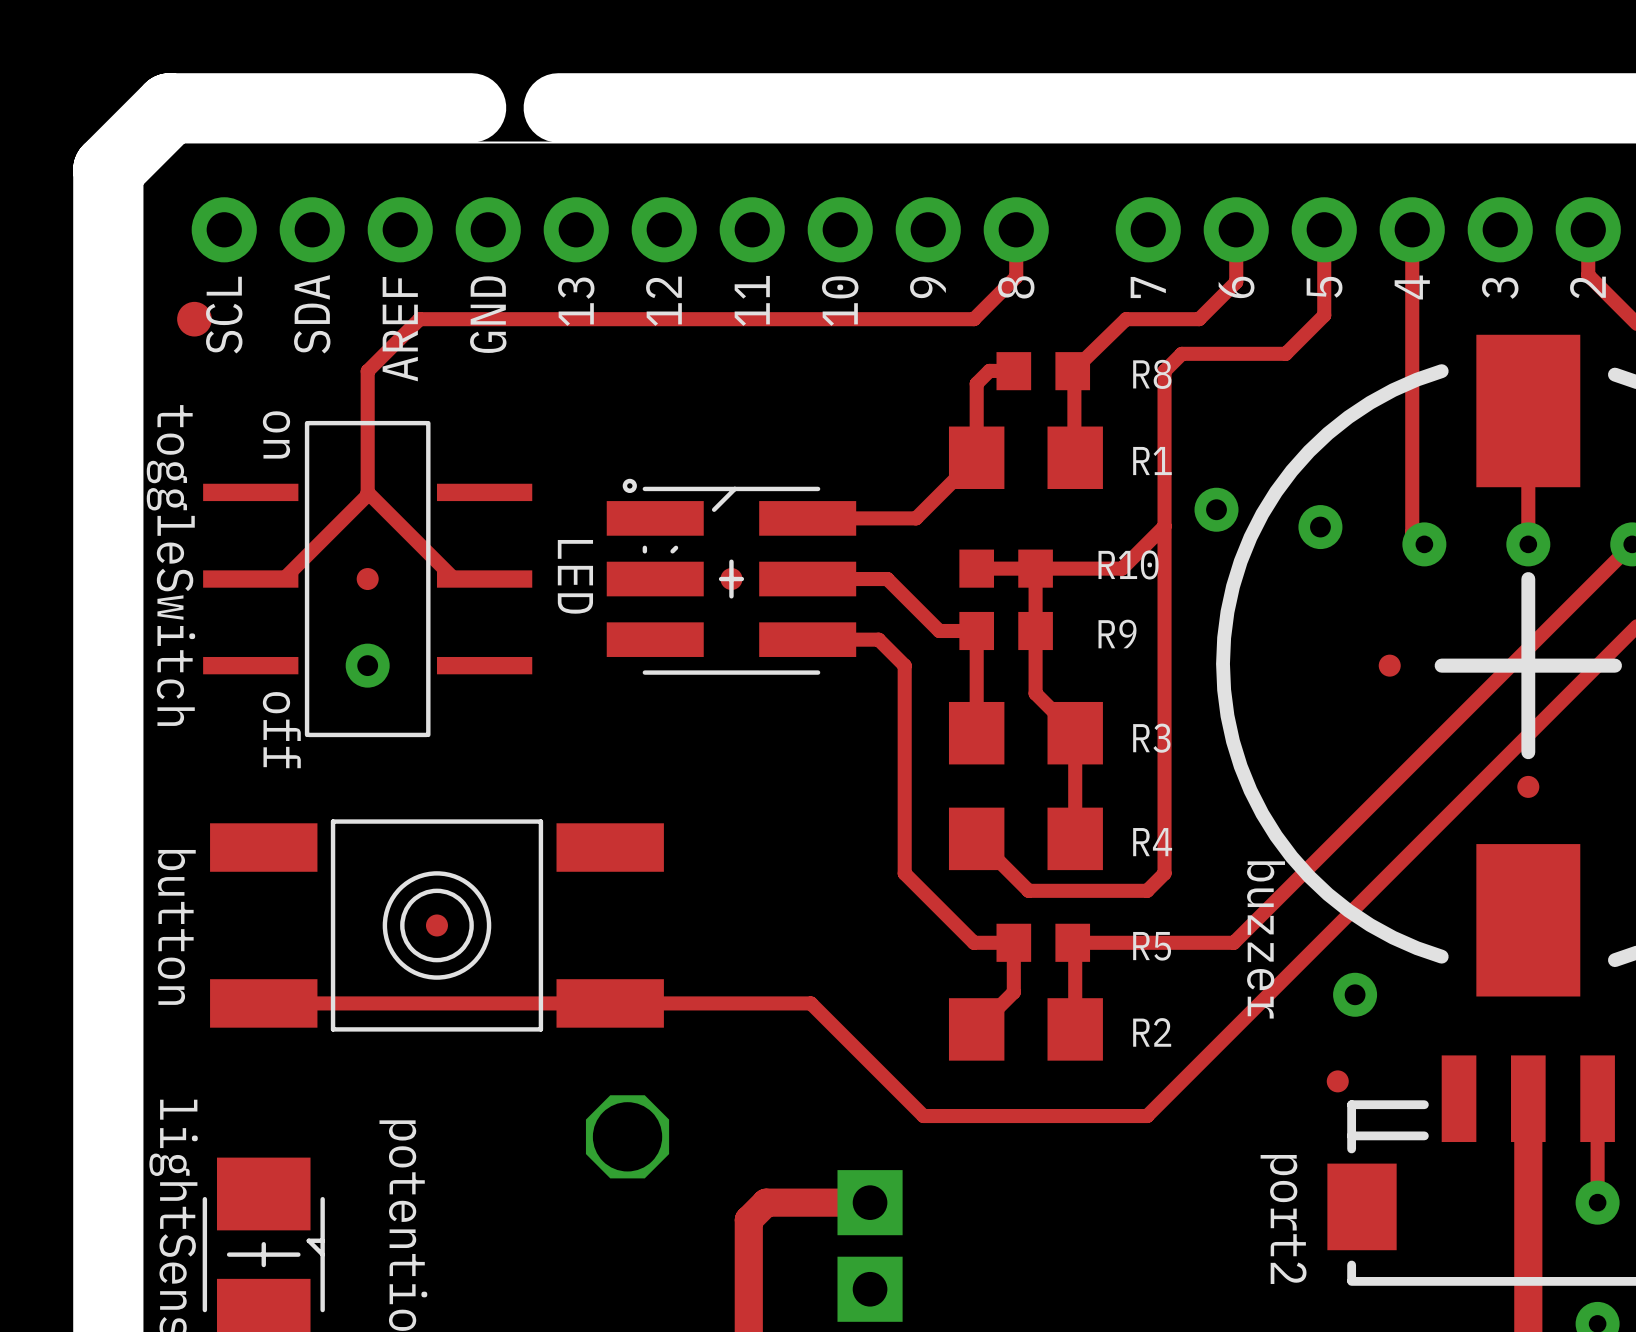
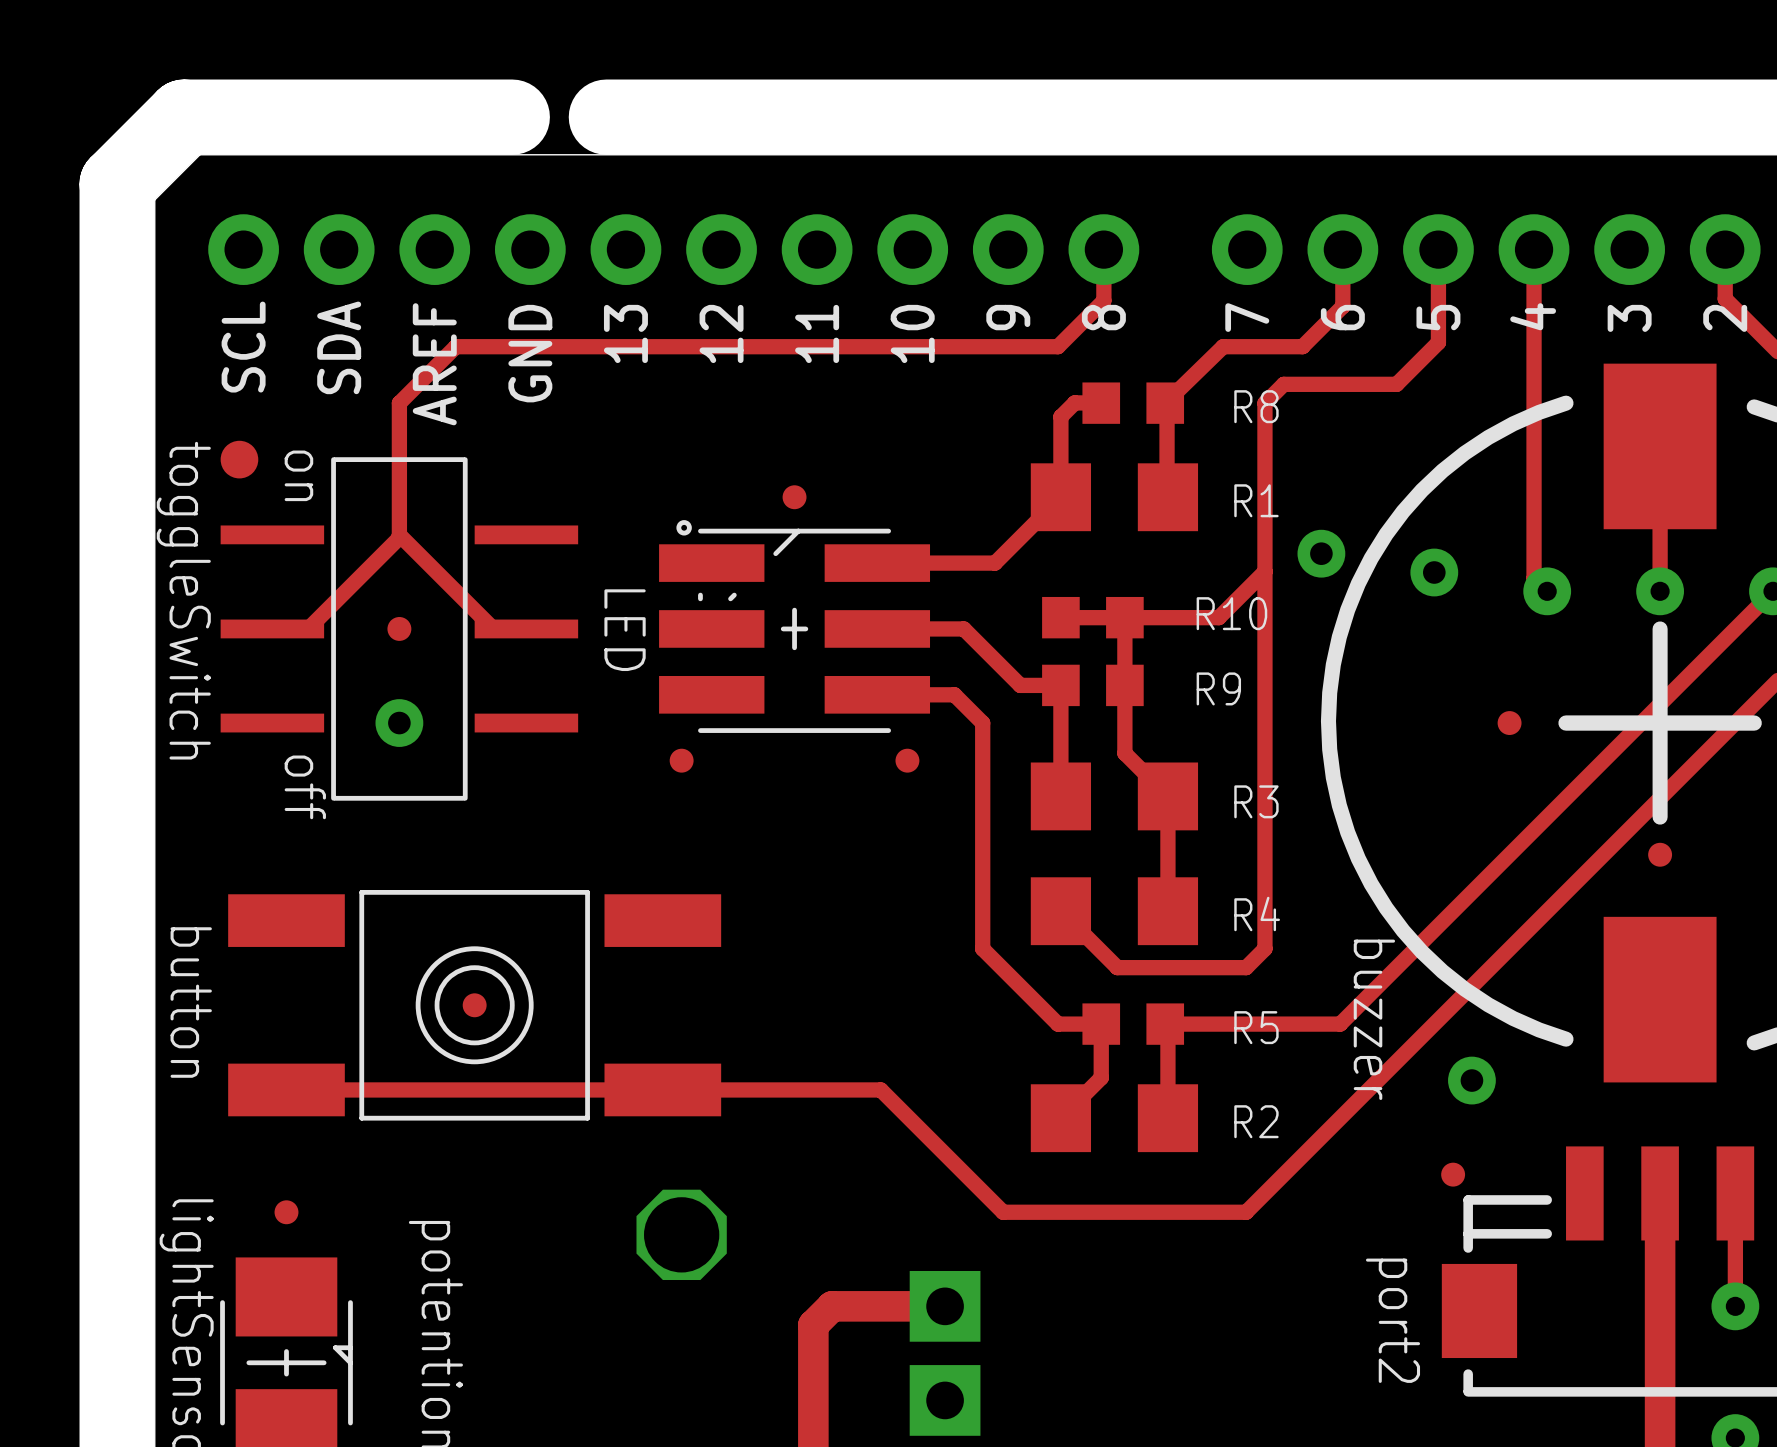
part position: (194, 319) -> (239, 459)
part: none -> (794, 497)
part: (731, 579) -> none
part: none -> (681, 760)
part: none -> (907, 760)
part: none -> (286, 1212)

